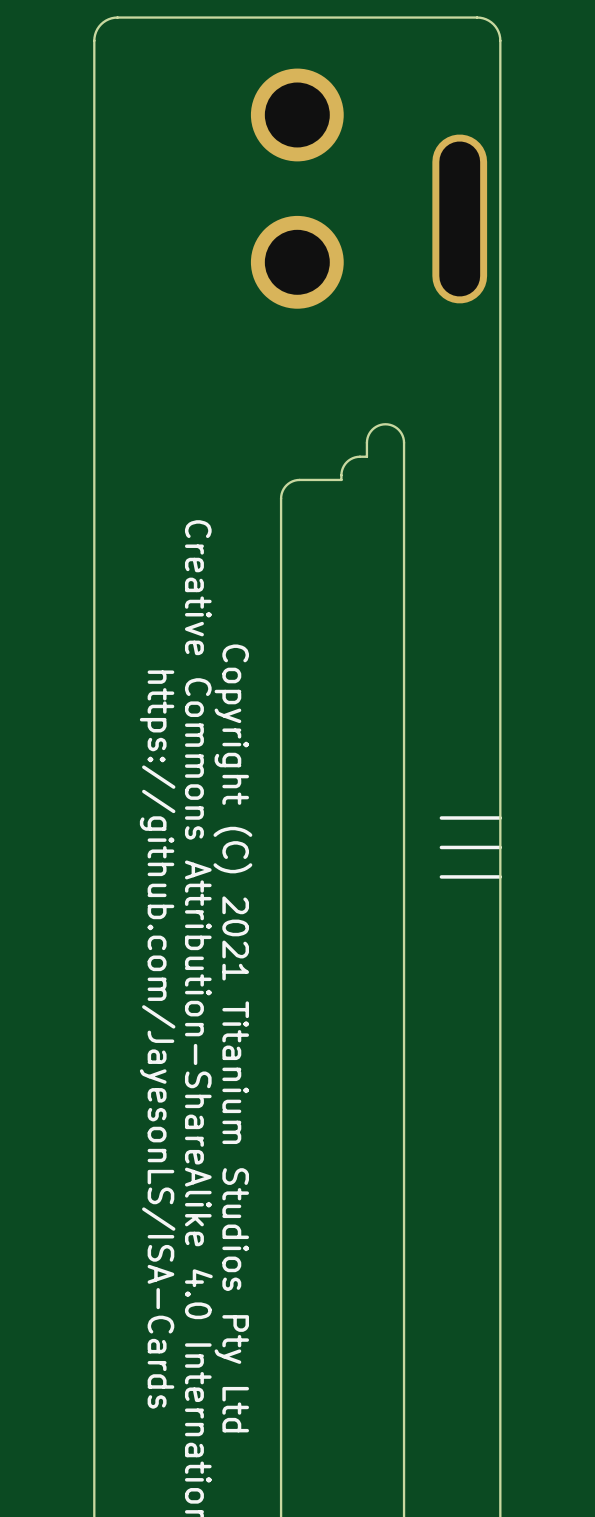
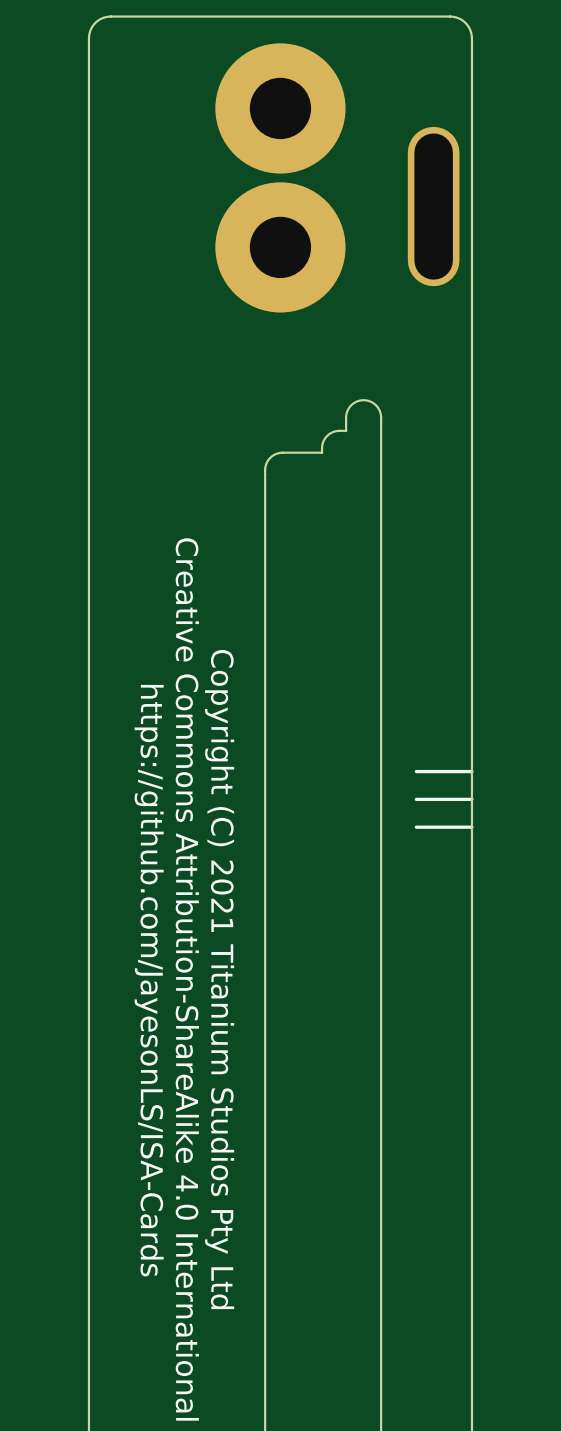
part footprint: [250, 68, 344, 162] -> [215, 43, 346, 174]
part footprint: [250, 215, 344, 309] -> [215, 182, 346, 313]

